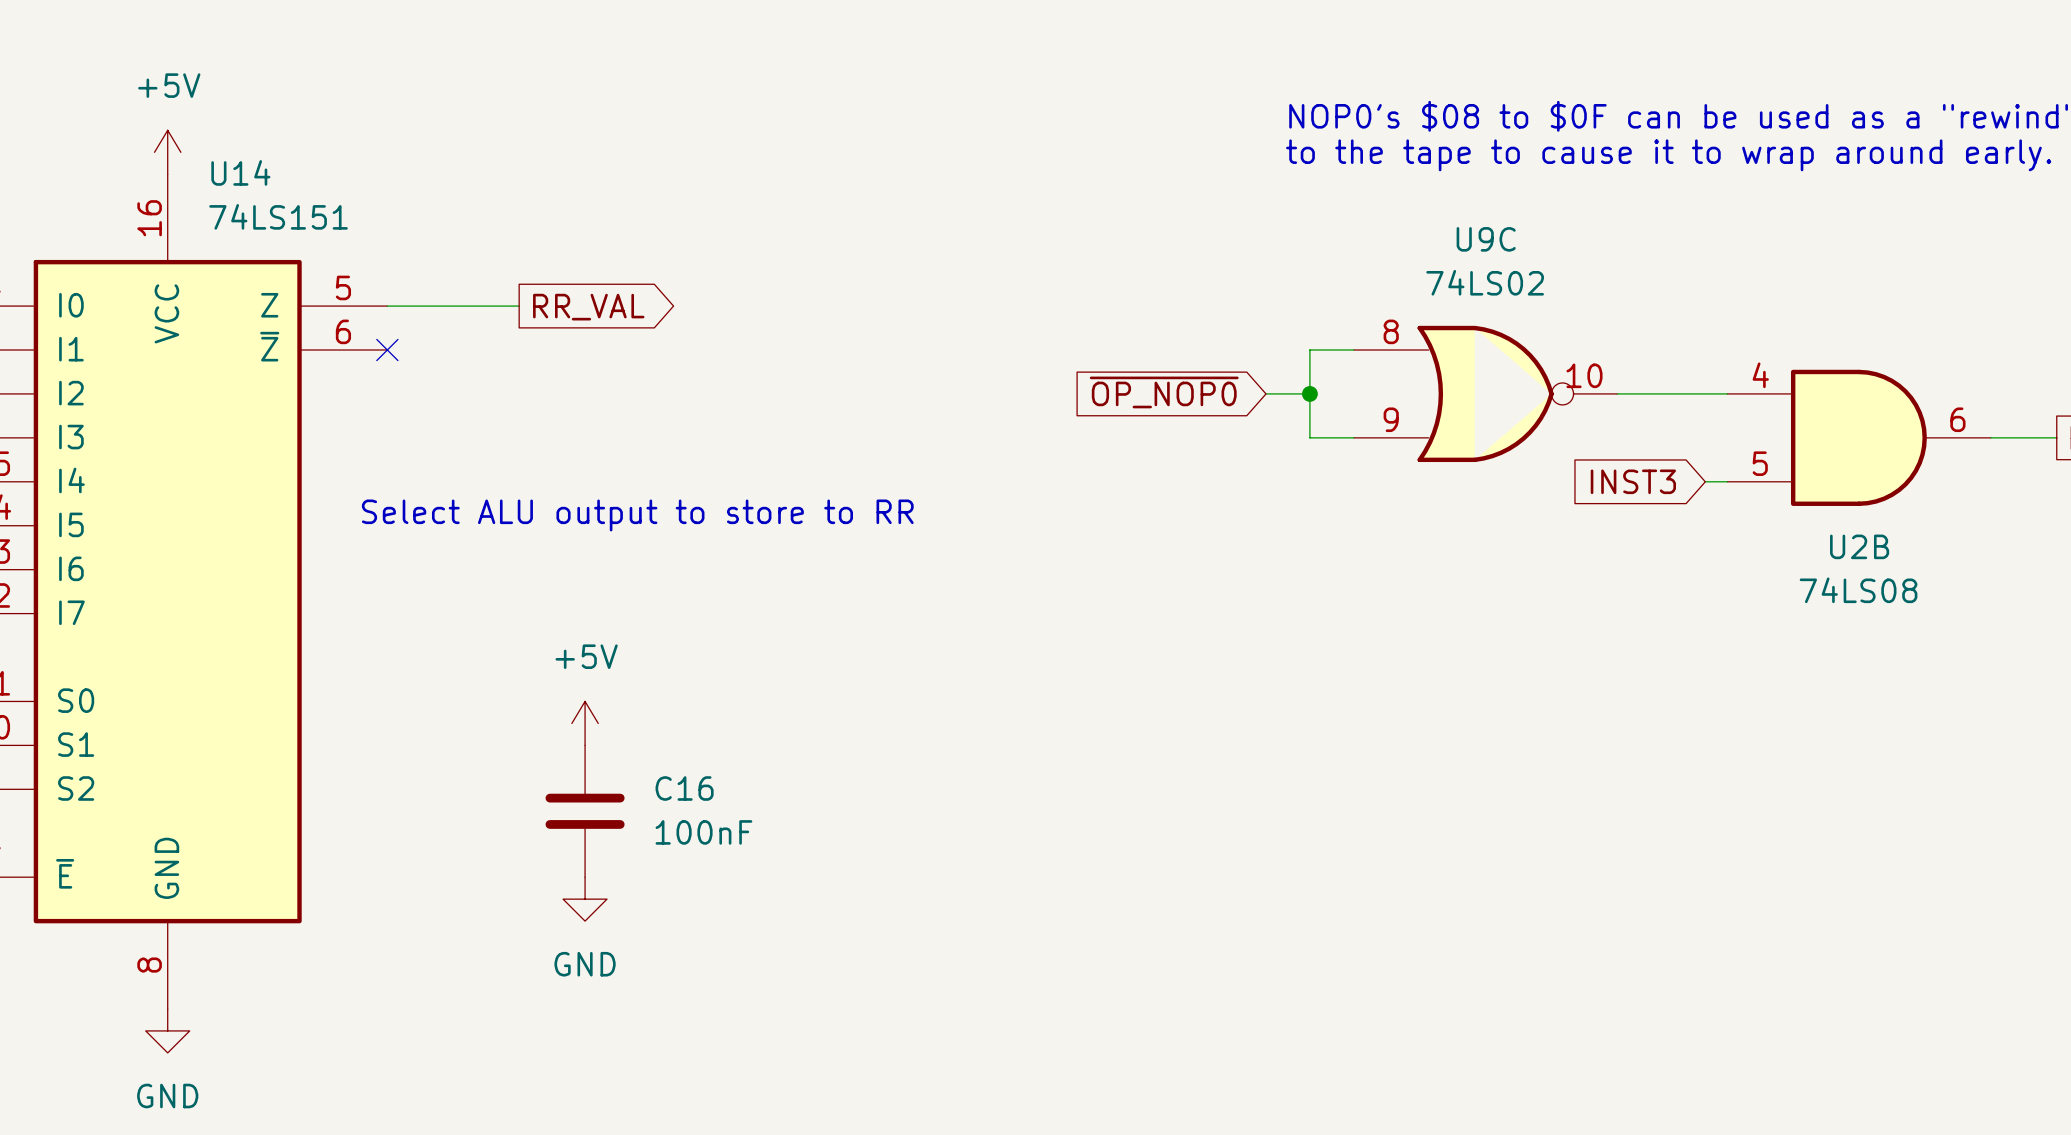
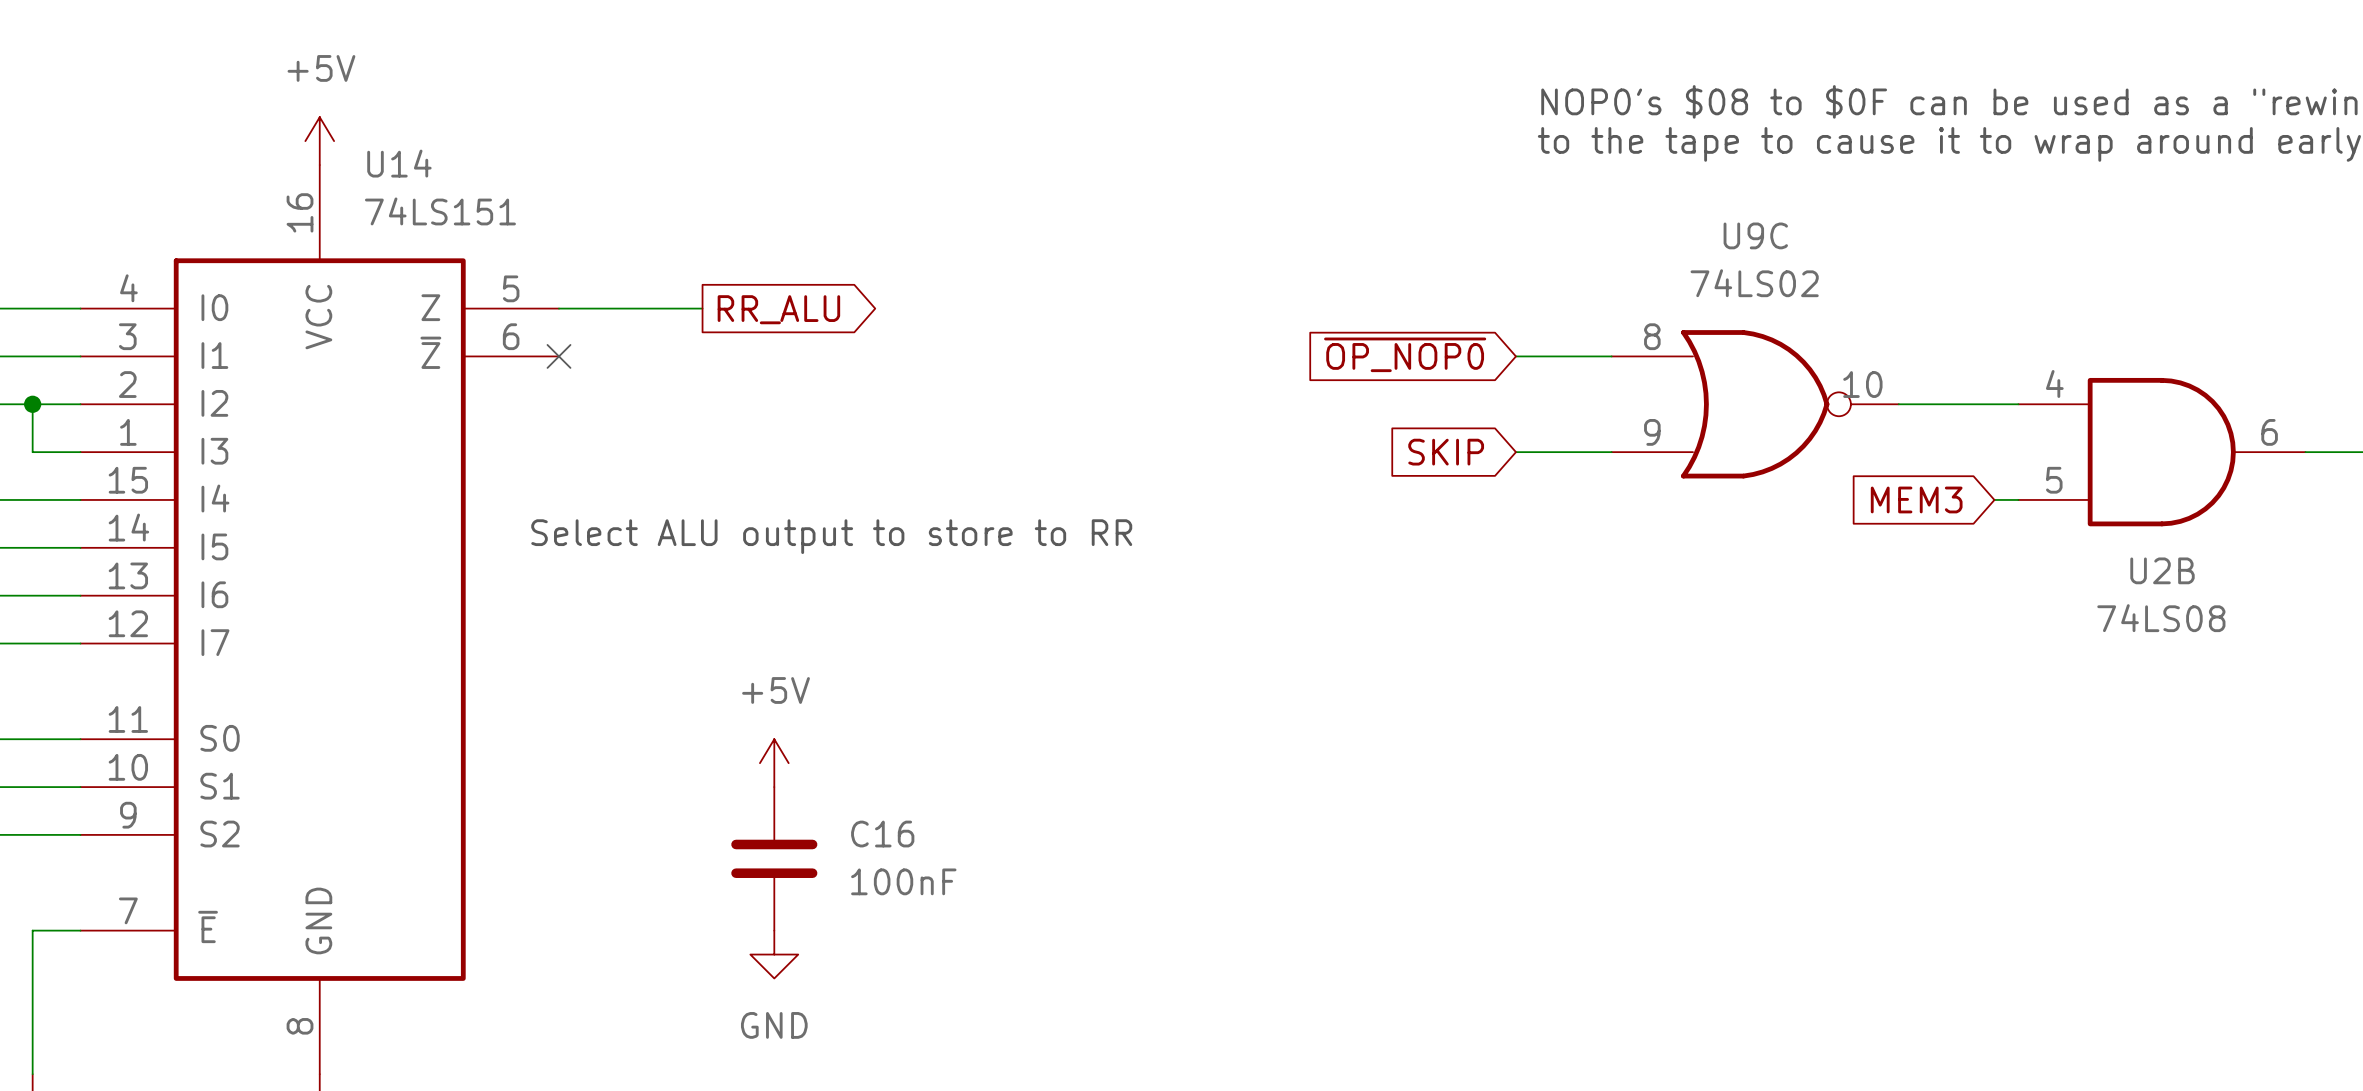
global label: RR_VAL (588, 307) -> RR_ALU (778, 309)
wire: (1309, 350) (1309, 437) -> (1563, 356) (1515, 356)
global label position: ~{OP_NOP0} (1164, 392) -> ~{OP_NOP0} (1405, 354)
wire: (1266, 393) (1309, 393) -> (1515, 452) (1563, 452)
junction: (1309, 393) -> none
global label: none -> SKIP (1446, 452)
global label: INST3 (1633, 481) -> MEM3 (1916, 499)

